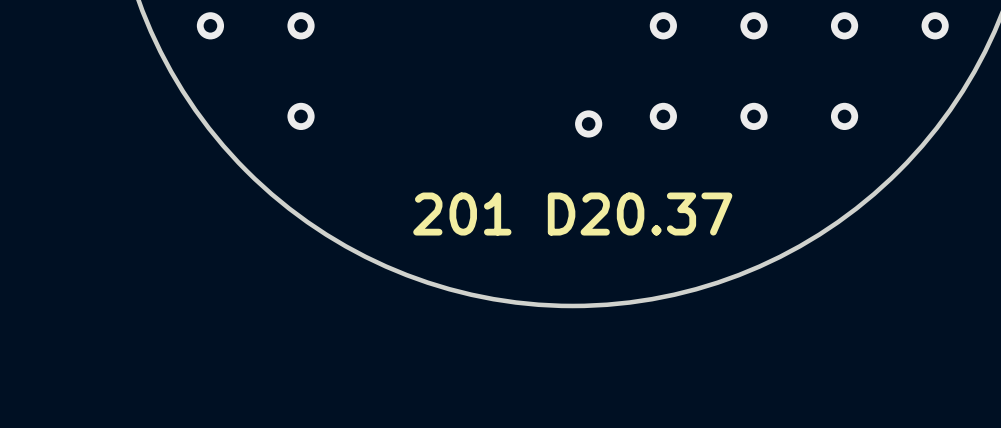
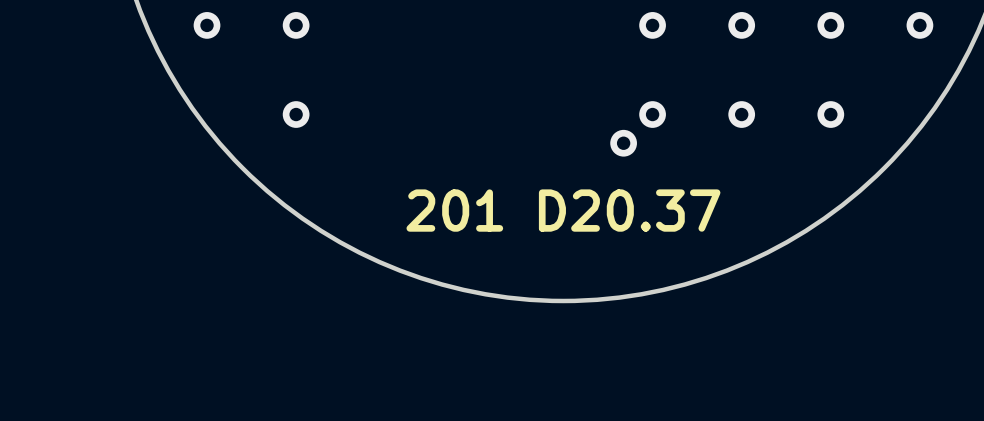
via position: (588, 123) -> (623, 143)

